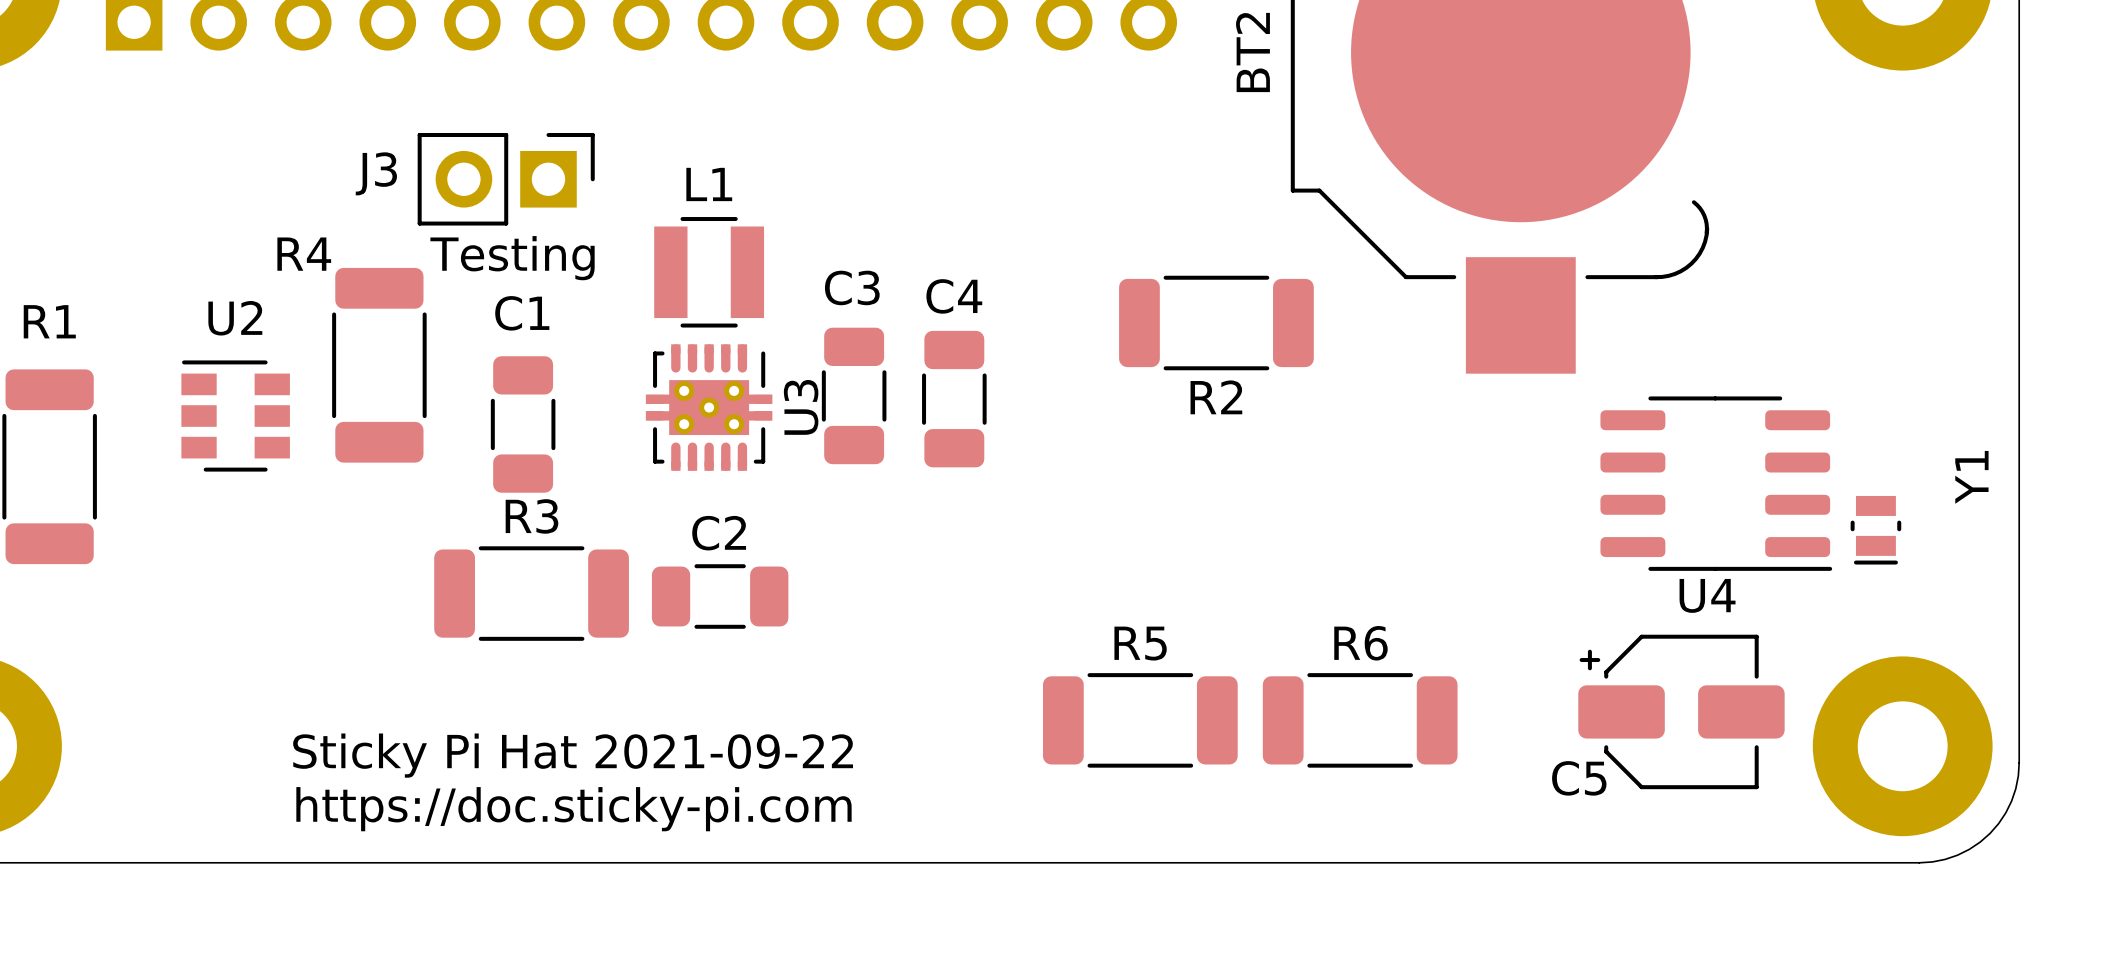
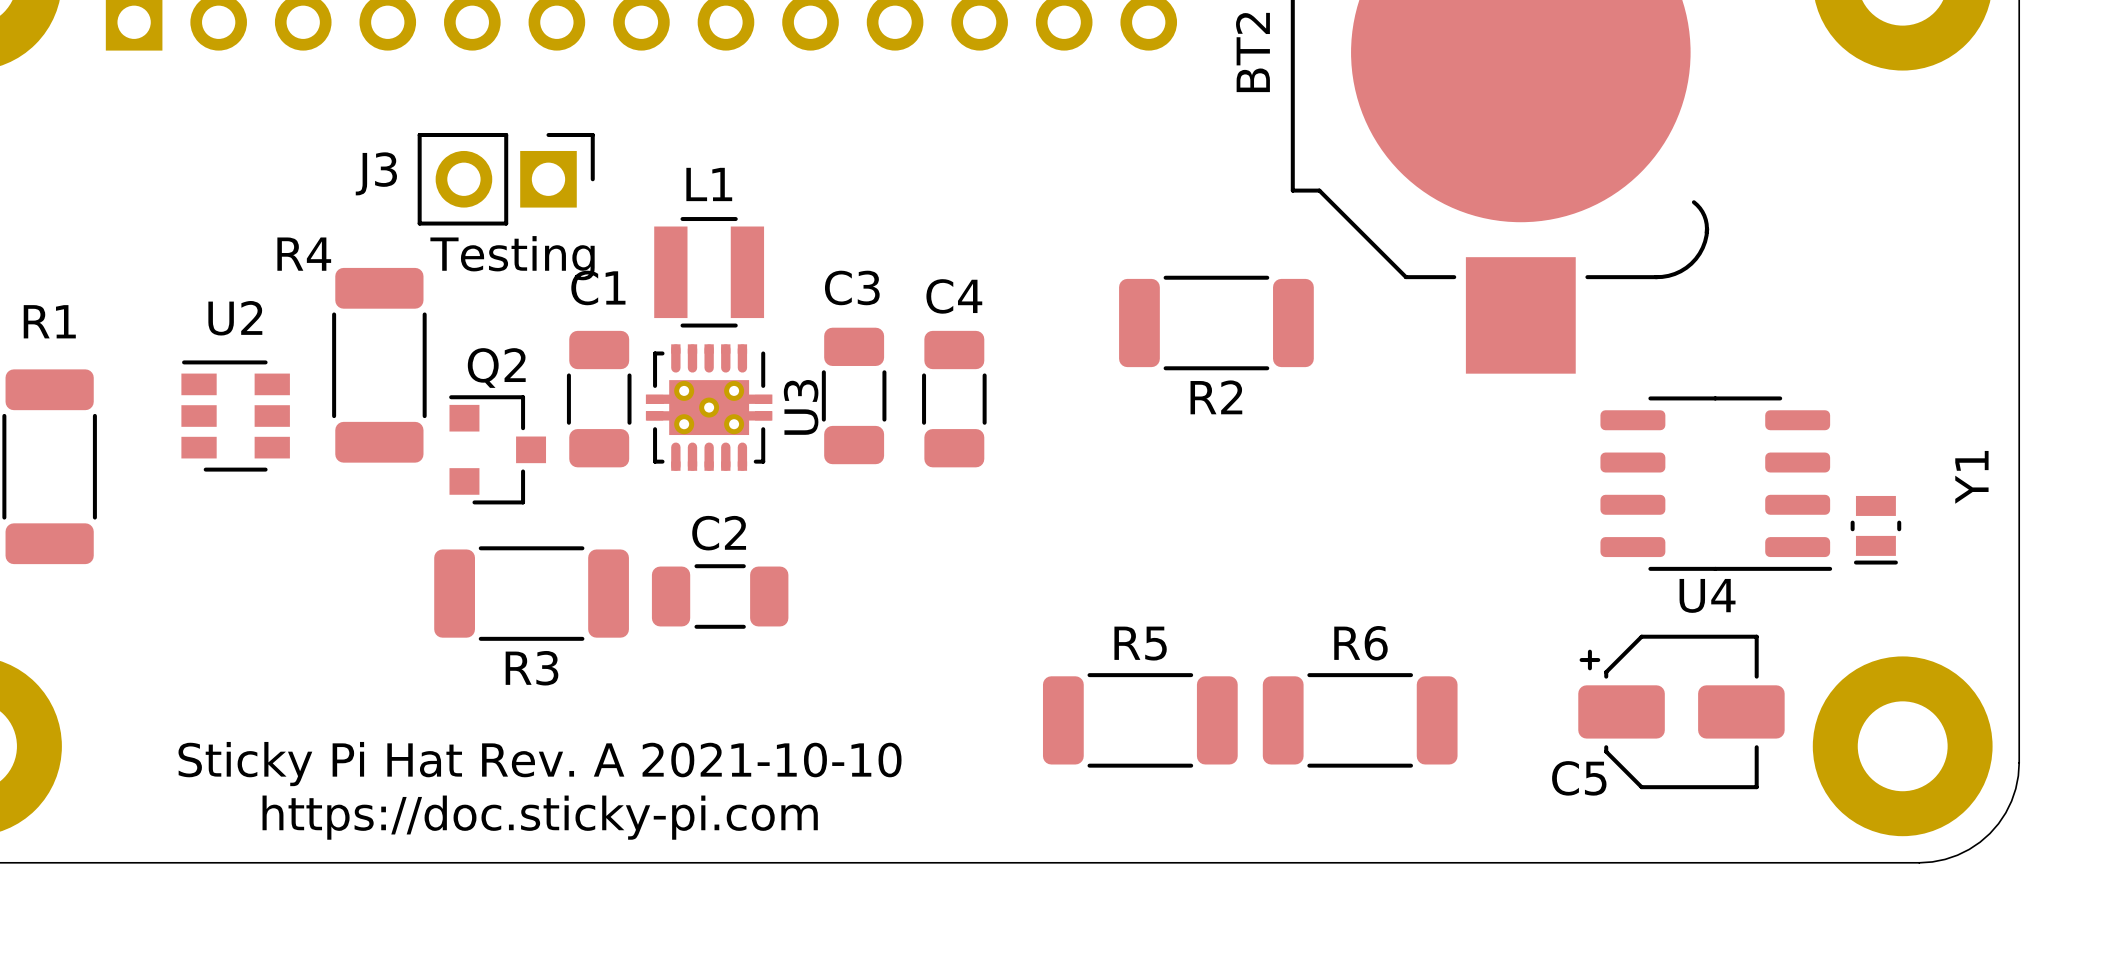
C1 position: (523, 424) -> (599, 399)
Q2: none -> (497, 449)
R3 name position: R3 (531, 516) -> R3 (531, 668)
text: Sticky Pi Hat 2021-09-22 (573, 755) -> Sticky Pi Hat Rev. A 2021-10-10 (540, 764)
text position: https://doc.sticky-pi.com (573, 809) -> https://doc.sticky-pi.com (540, 817)

